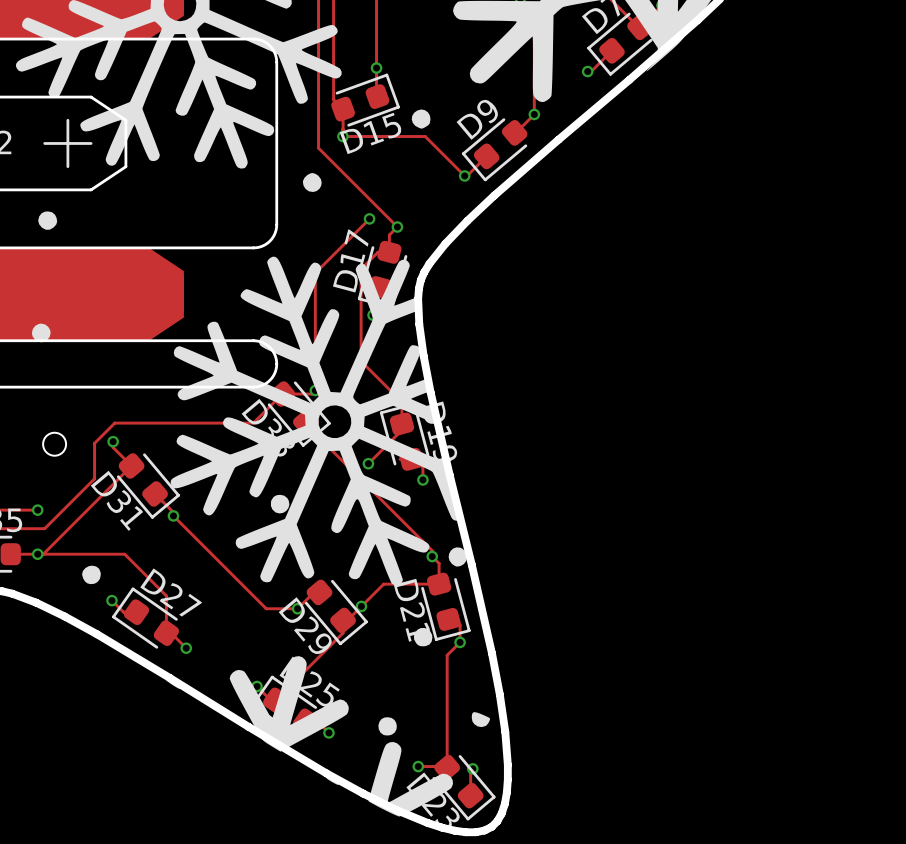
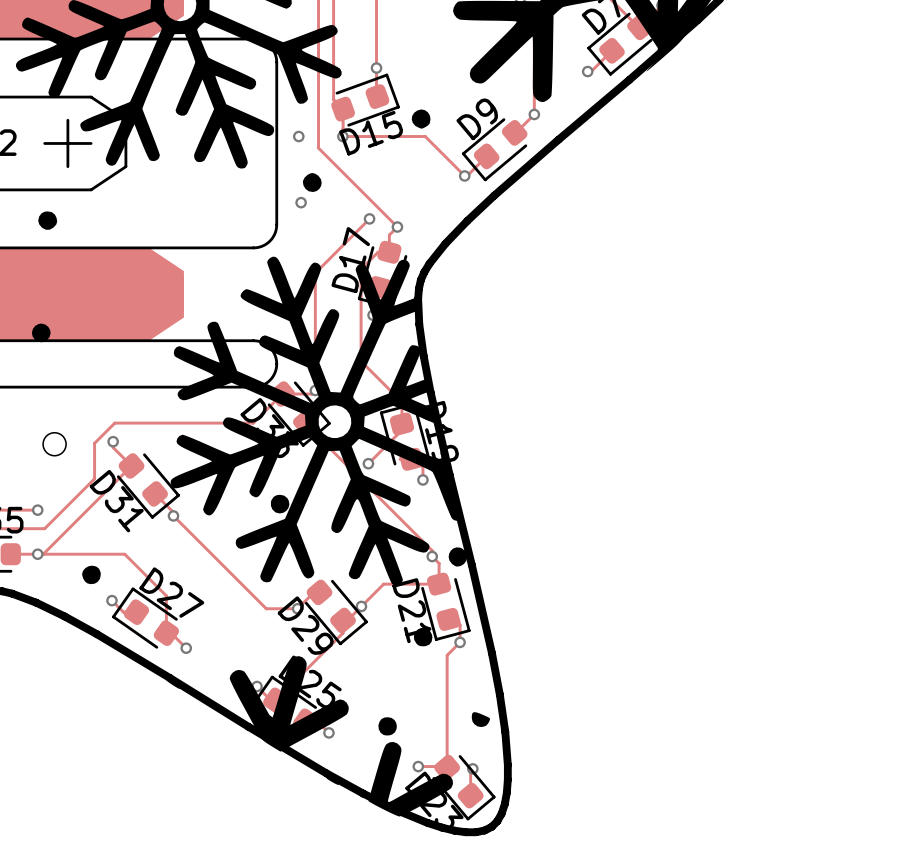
via: none -> (298, 136)
via: none -> (301, 202)

